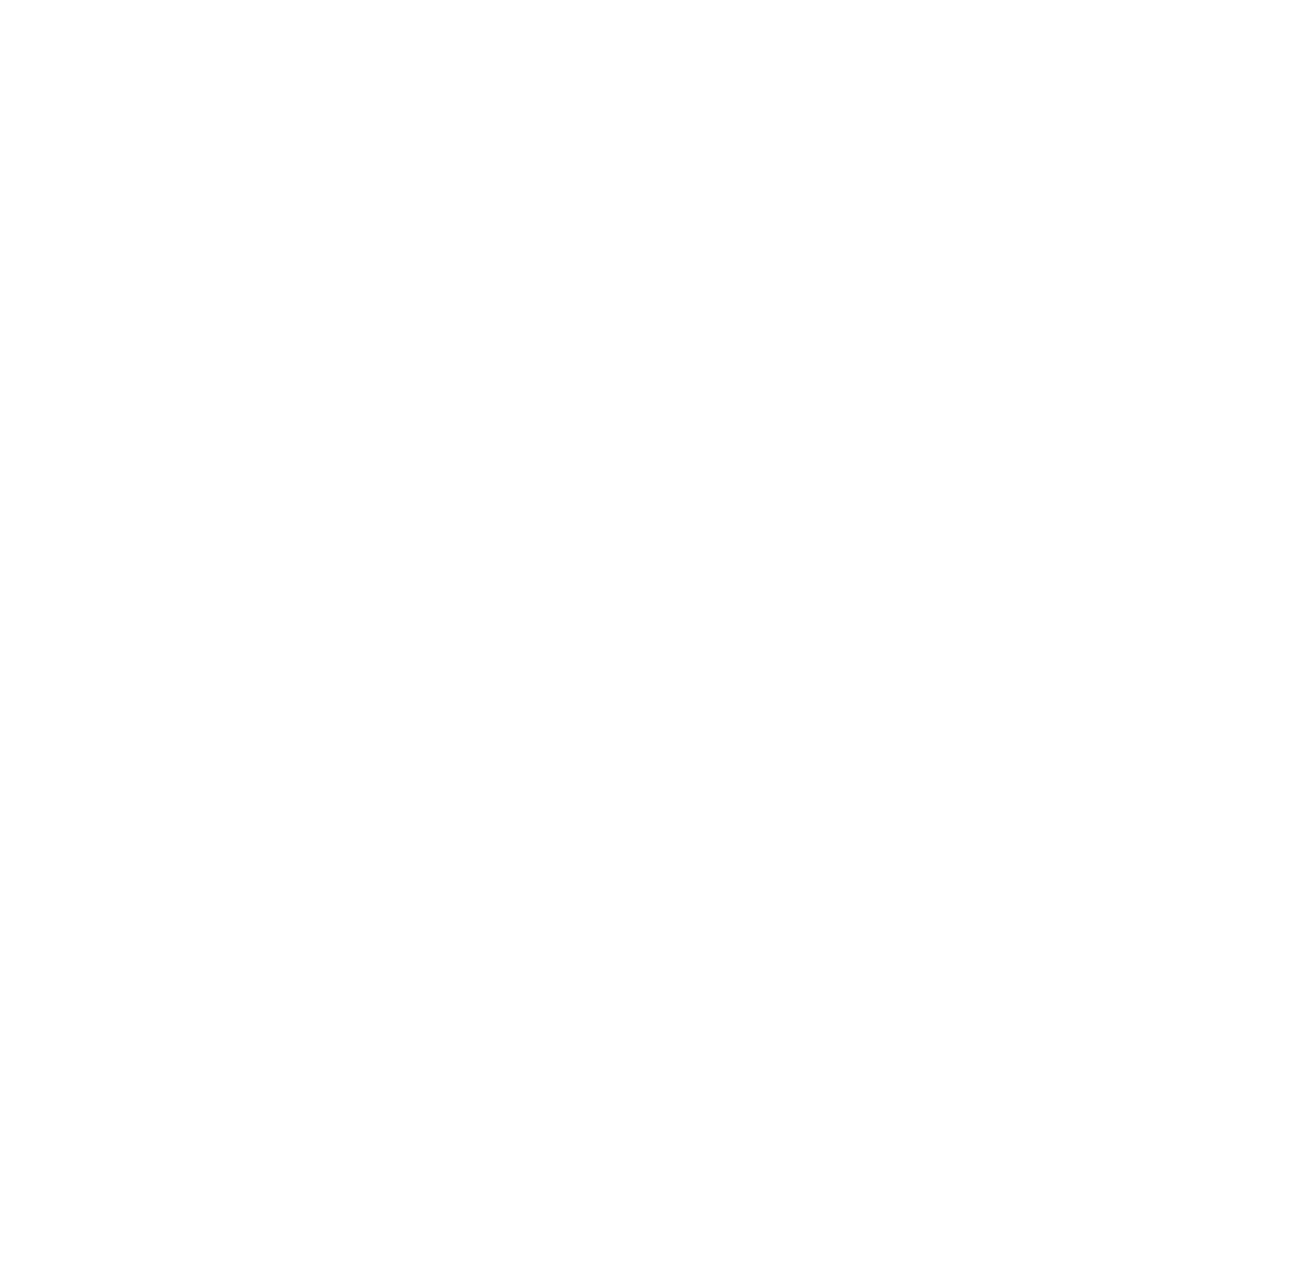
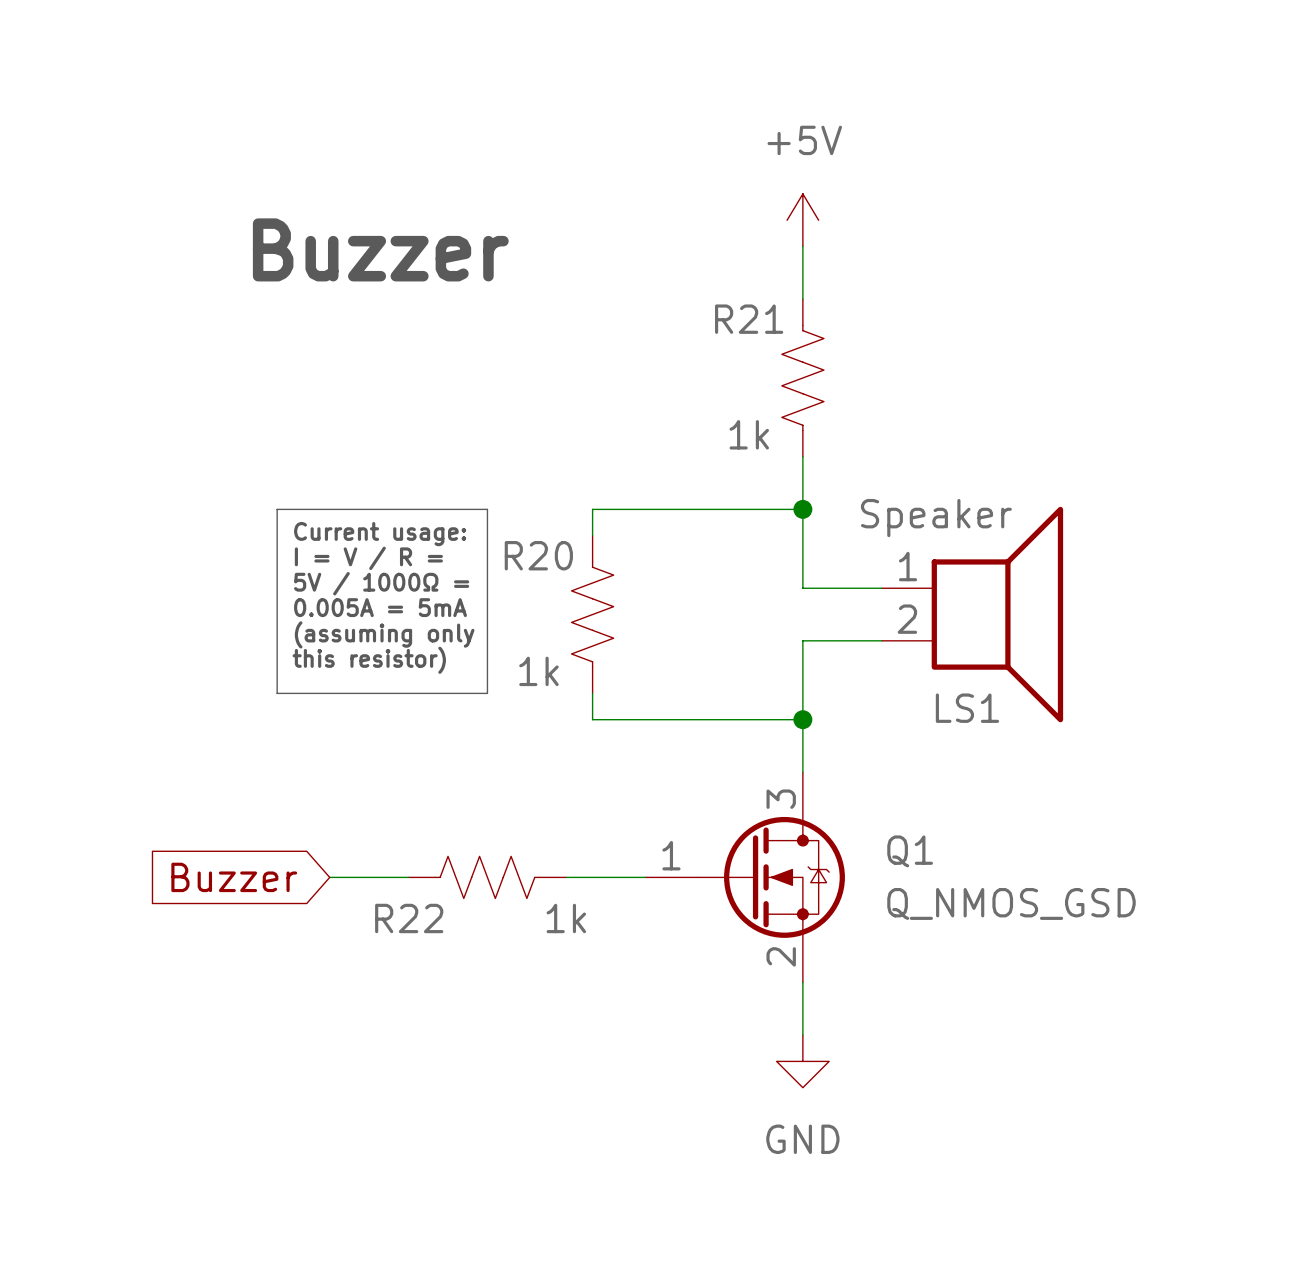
power symbol: none -> +5V (802, 220)
wire: none -> (802, 246) (802, 299)
text: none -> Buzzer (380, 249)
R21: none -> 1k (802, 377)
wire: none -> (802, 456) (802, 588) (881, 588)
line: none -> (277, 509) (487, 509) (487, 693) (277, 693) (277, 509)
wire: none -> (802, 509) (592, 509) (592, 535)
junction: none -> (802, 509)
text: none -> Current usage: (380, 534)
text: none -> I = V / R = (368, 558)
text: none -> 5V / 1000Ω = (381, 583)
text: none -> 0.005A = 5mA (380, 607)
R20: none -> 1k (592, 614)
LS1: none -> Speaker (972, 614)
text: none -> (assuming only (384, 634)
wire: none -> (881, 640) (802, 640) (802, 772)
text: none -> this resistor) (369, 660)
wire: none -> (592, 693) (592, 719) (802, 719)
junction: none -> (802, 719)
global label: none -> Buzzer (234, 877)
wire: none -> (329, 877) (408, 877)
R22: none -> 1k (487, 877)
wire: none -> (566, 877) (645, 877)
Q1: none -> Q_NMOS_GSD (745, 877)
wire: none -> (802, 982) (802, 1035)
power symbol: none -> GND (802, 1061)

